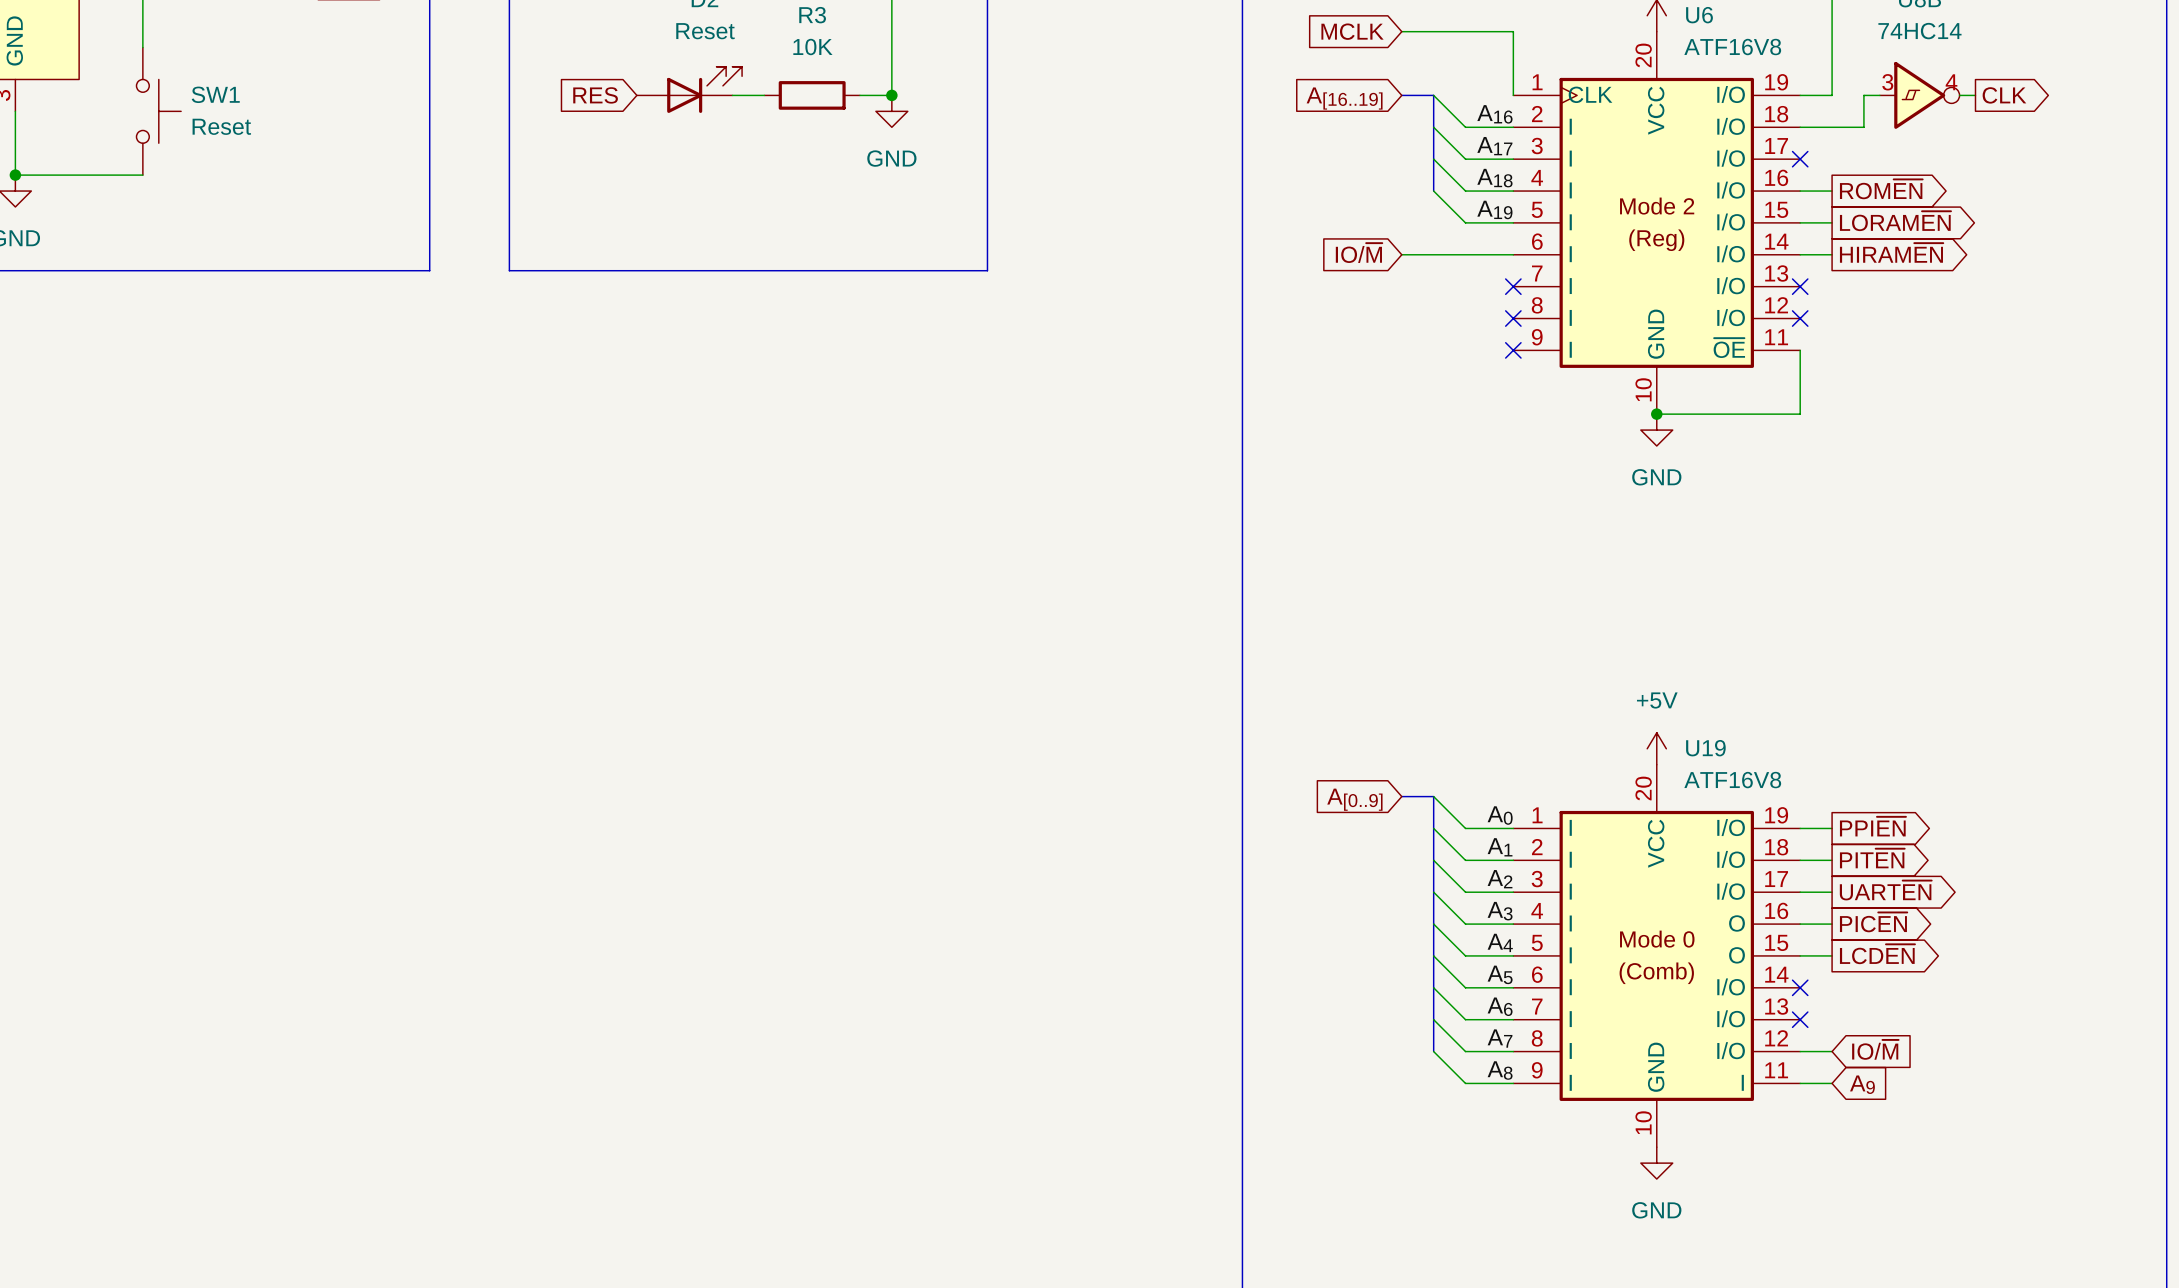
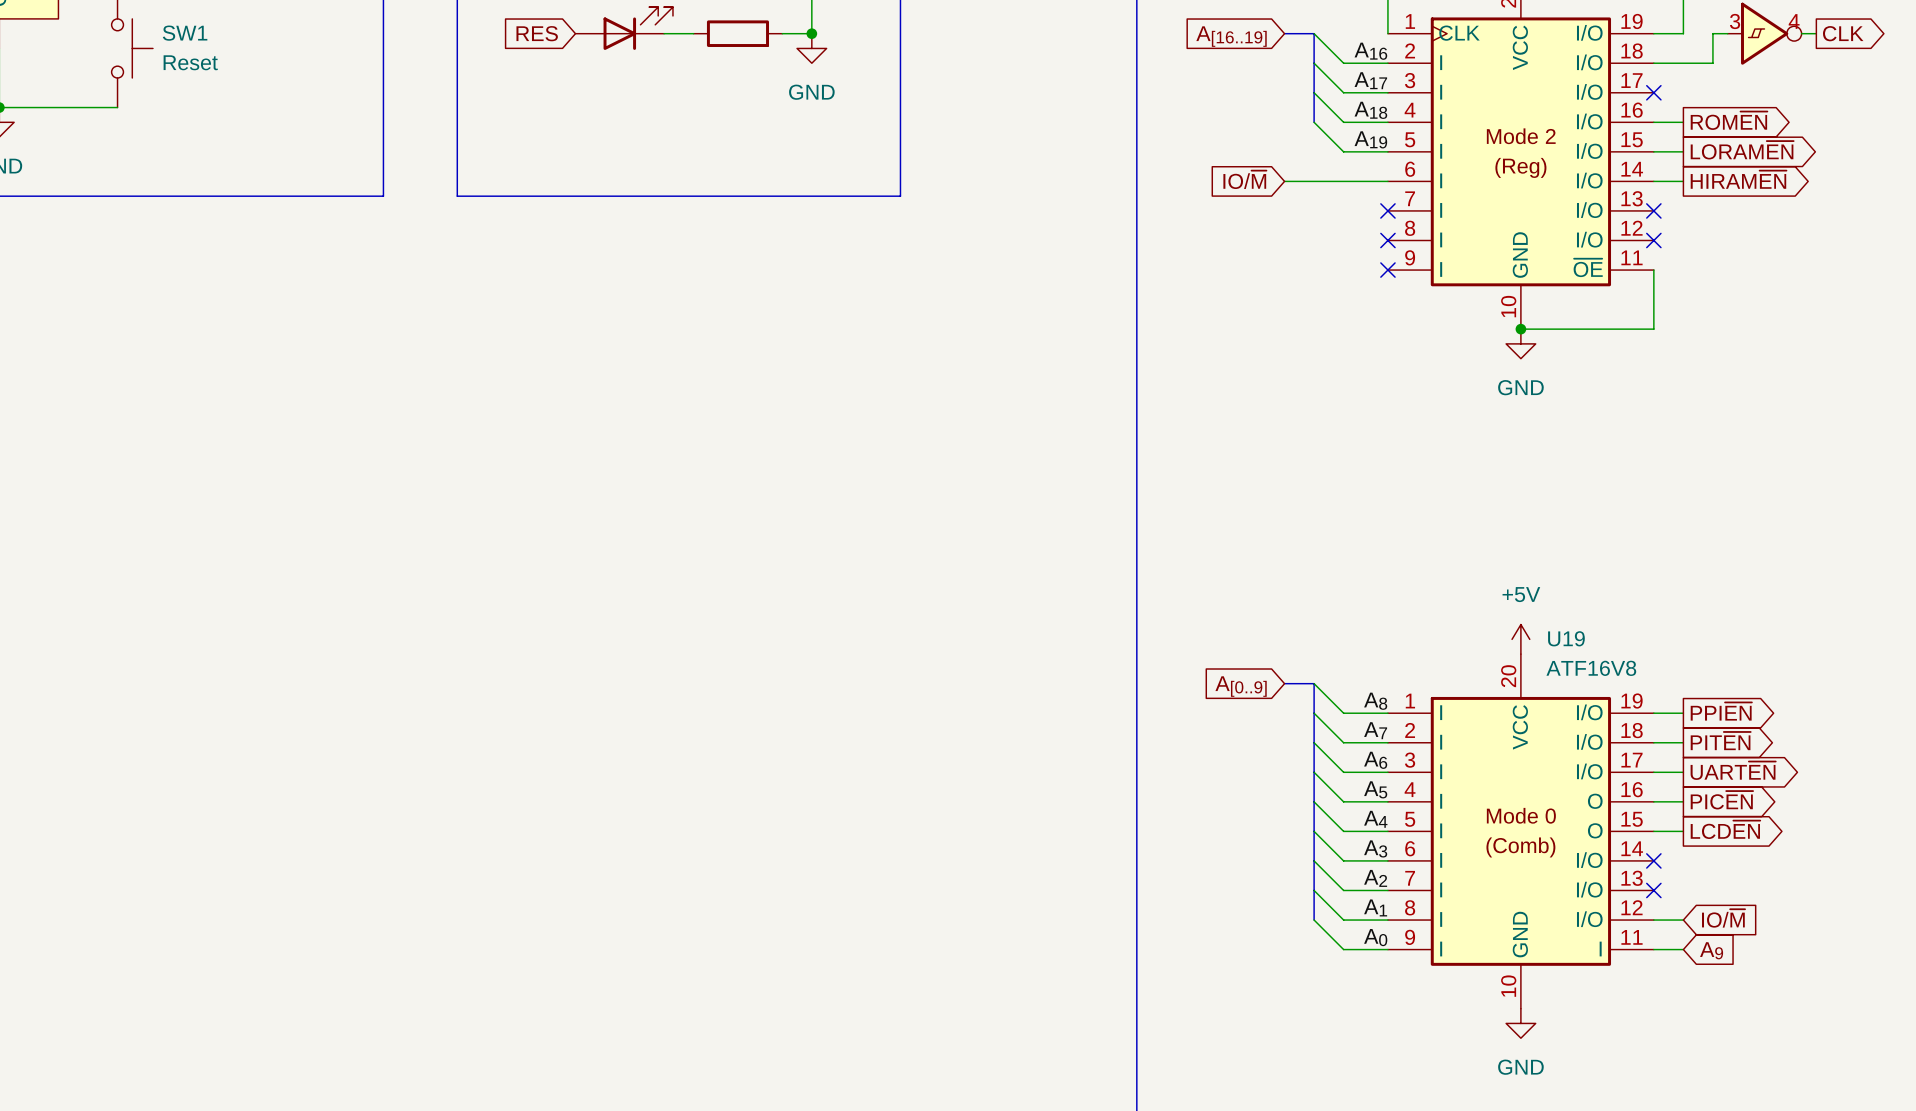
label: A0 (1500, 815) -> A8 (1375, 701)
label: A1 (1500, 847) -> A7 (1375, 730)
label: A2 (1500, 879) -> A6 (1375, 760)
label: A3 (1500, 911) -> A5 (1375, 789)
label: A5 (1500, 974) -> A3 (1375, 848)
label: A6 (1500, 1006) -> A2 (1375, 878)
label: A7 (1500, 1038) -> A1 (1375, 907)
label: A8 (1500, 1070) -> A0 (1375, 937)

